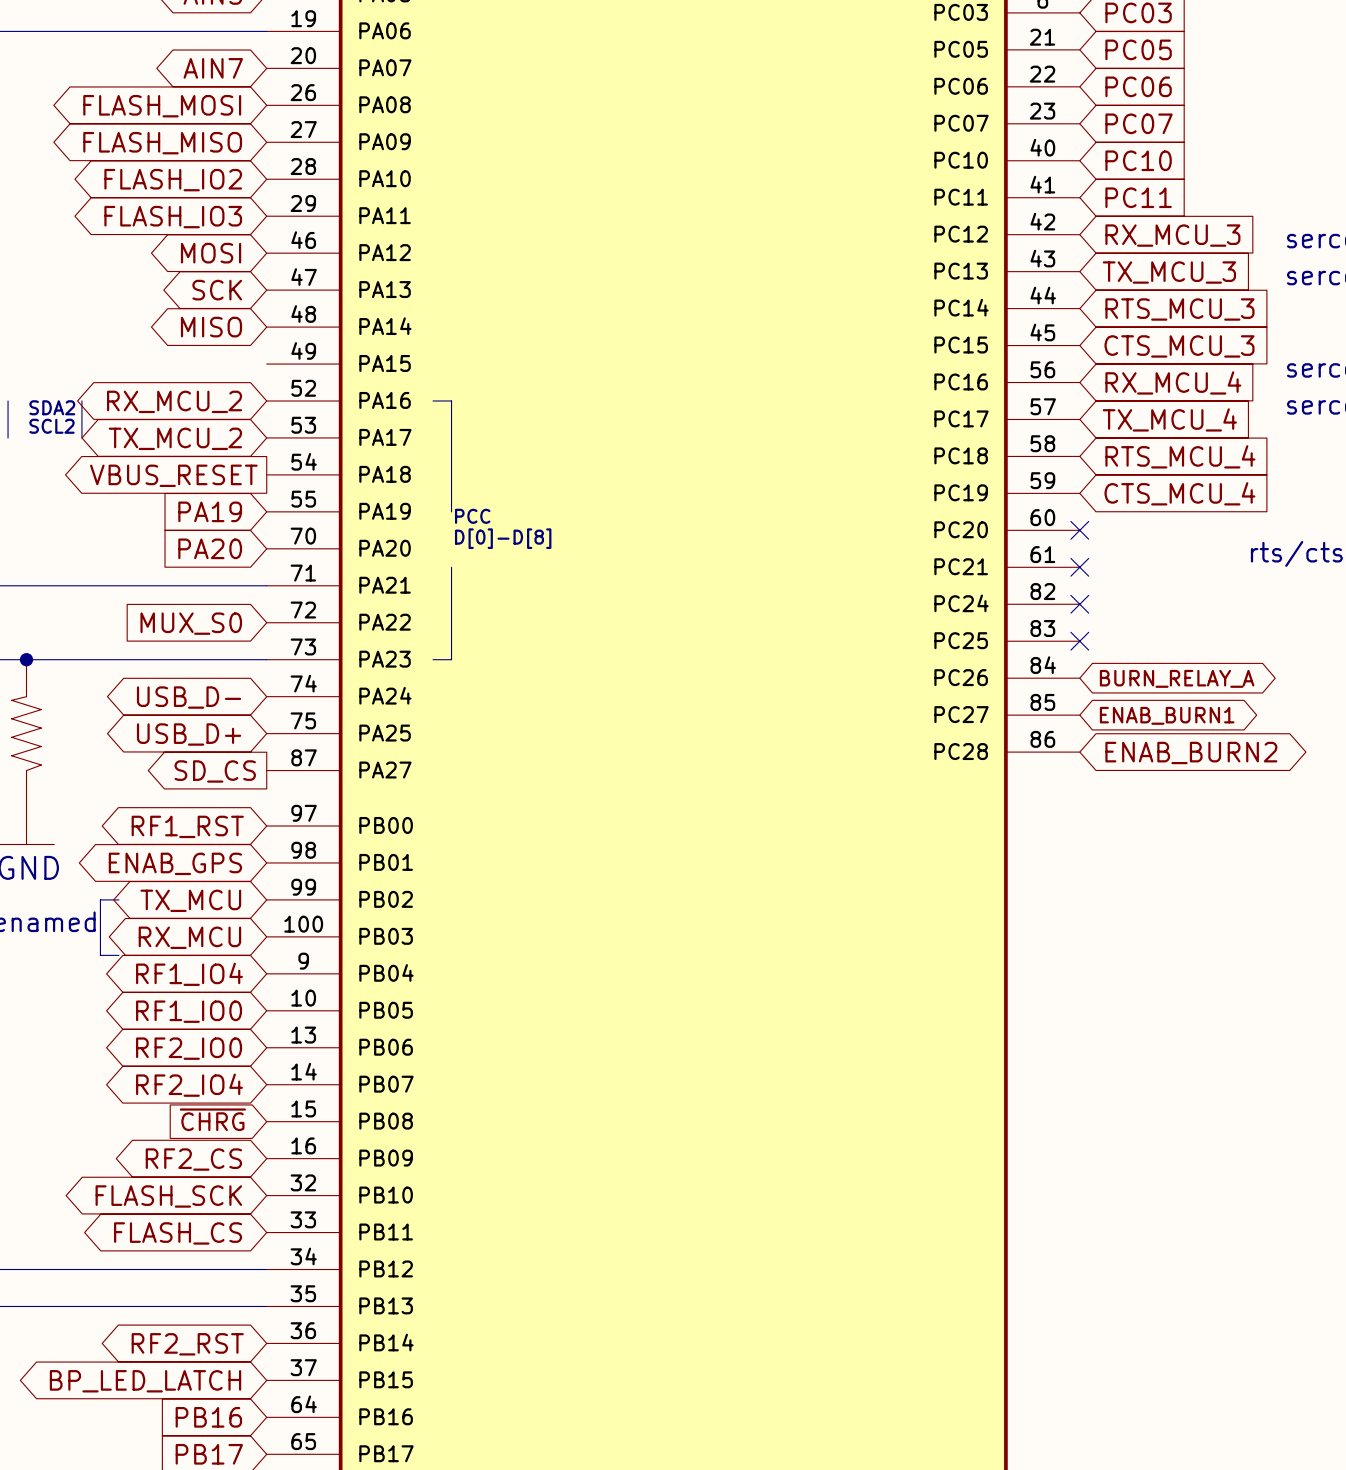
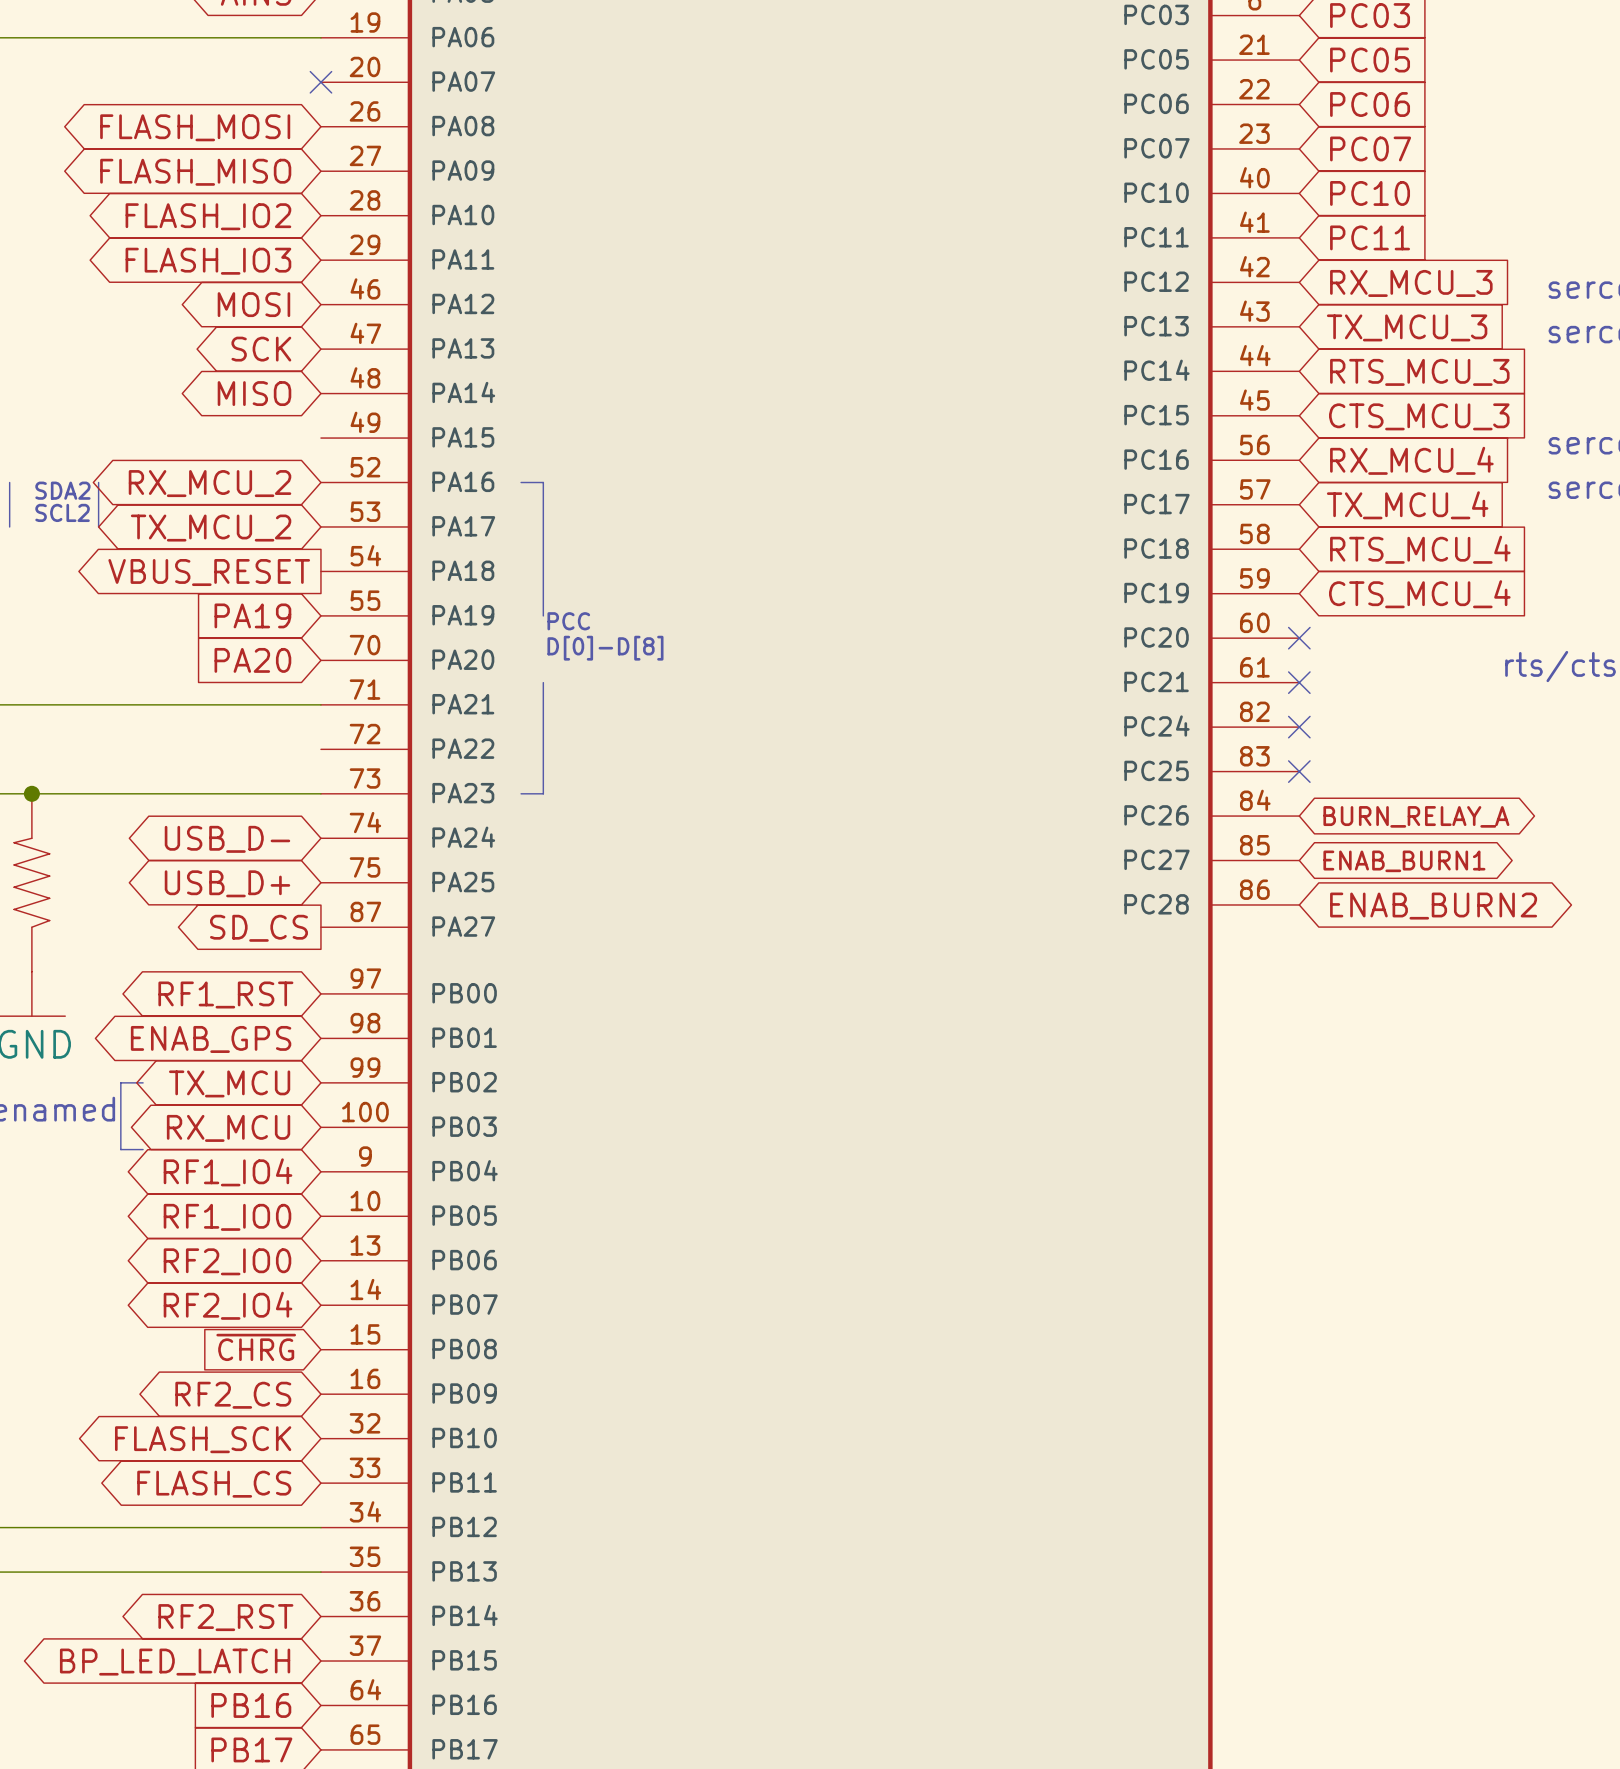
global label: AIN7 (213, 68) -> none
no-connect mark: none -> (320, 82)
global label: MUX_S0 (191, 623) -> none

